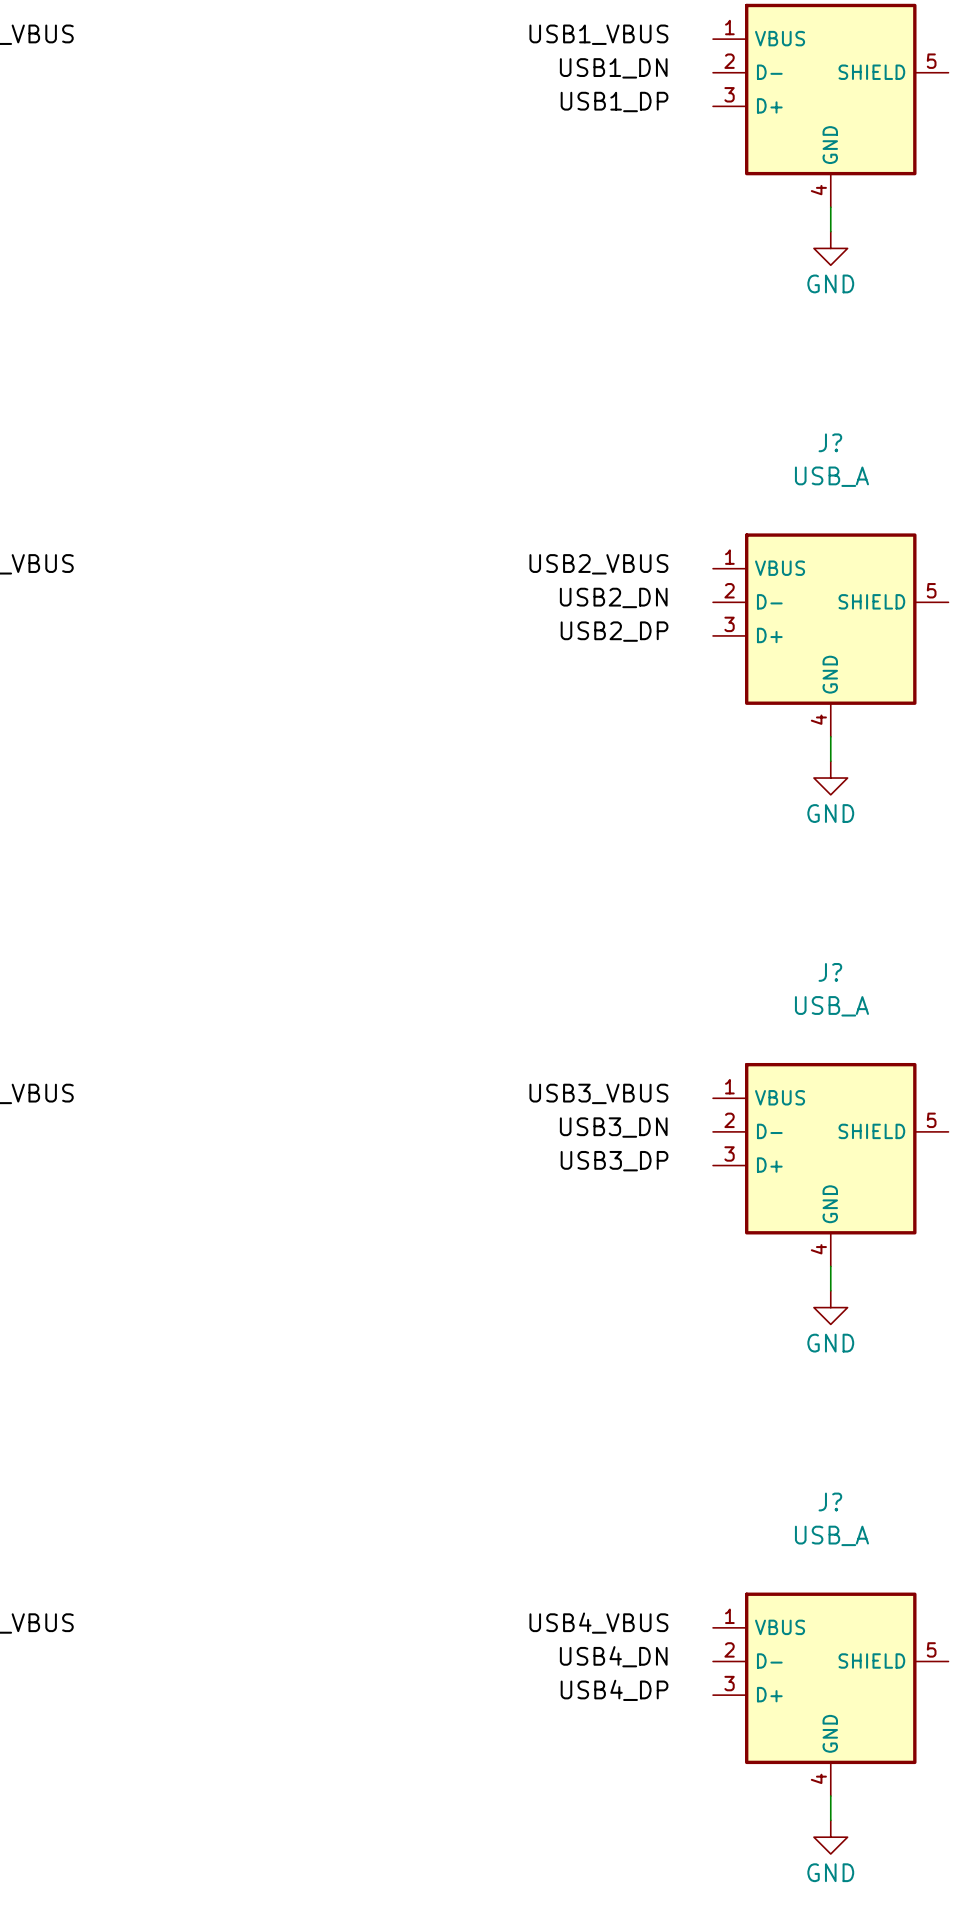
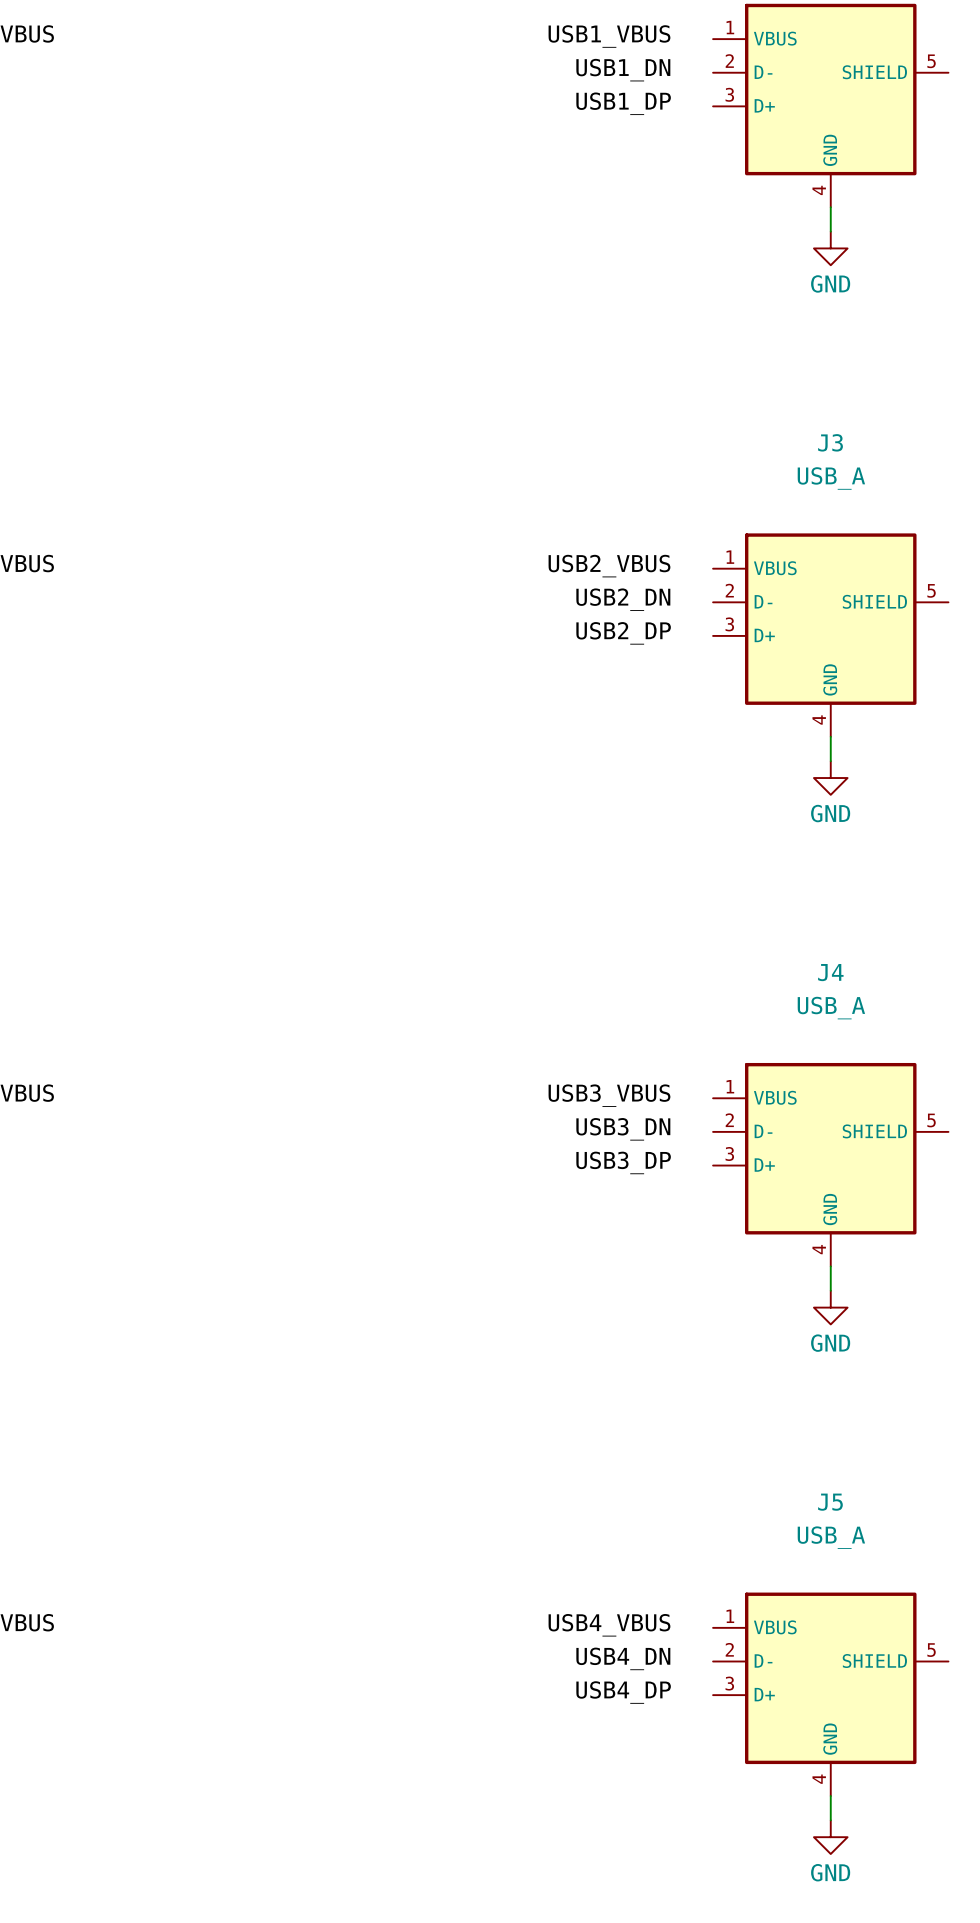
J? name: J? (830, 442) -> J3 (830, 442)
J? name: J? (830, 972) -> J4 (830, 972)
J? name: J? (830, 1501) -> J5 (830, 1502)

